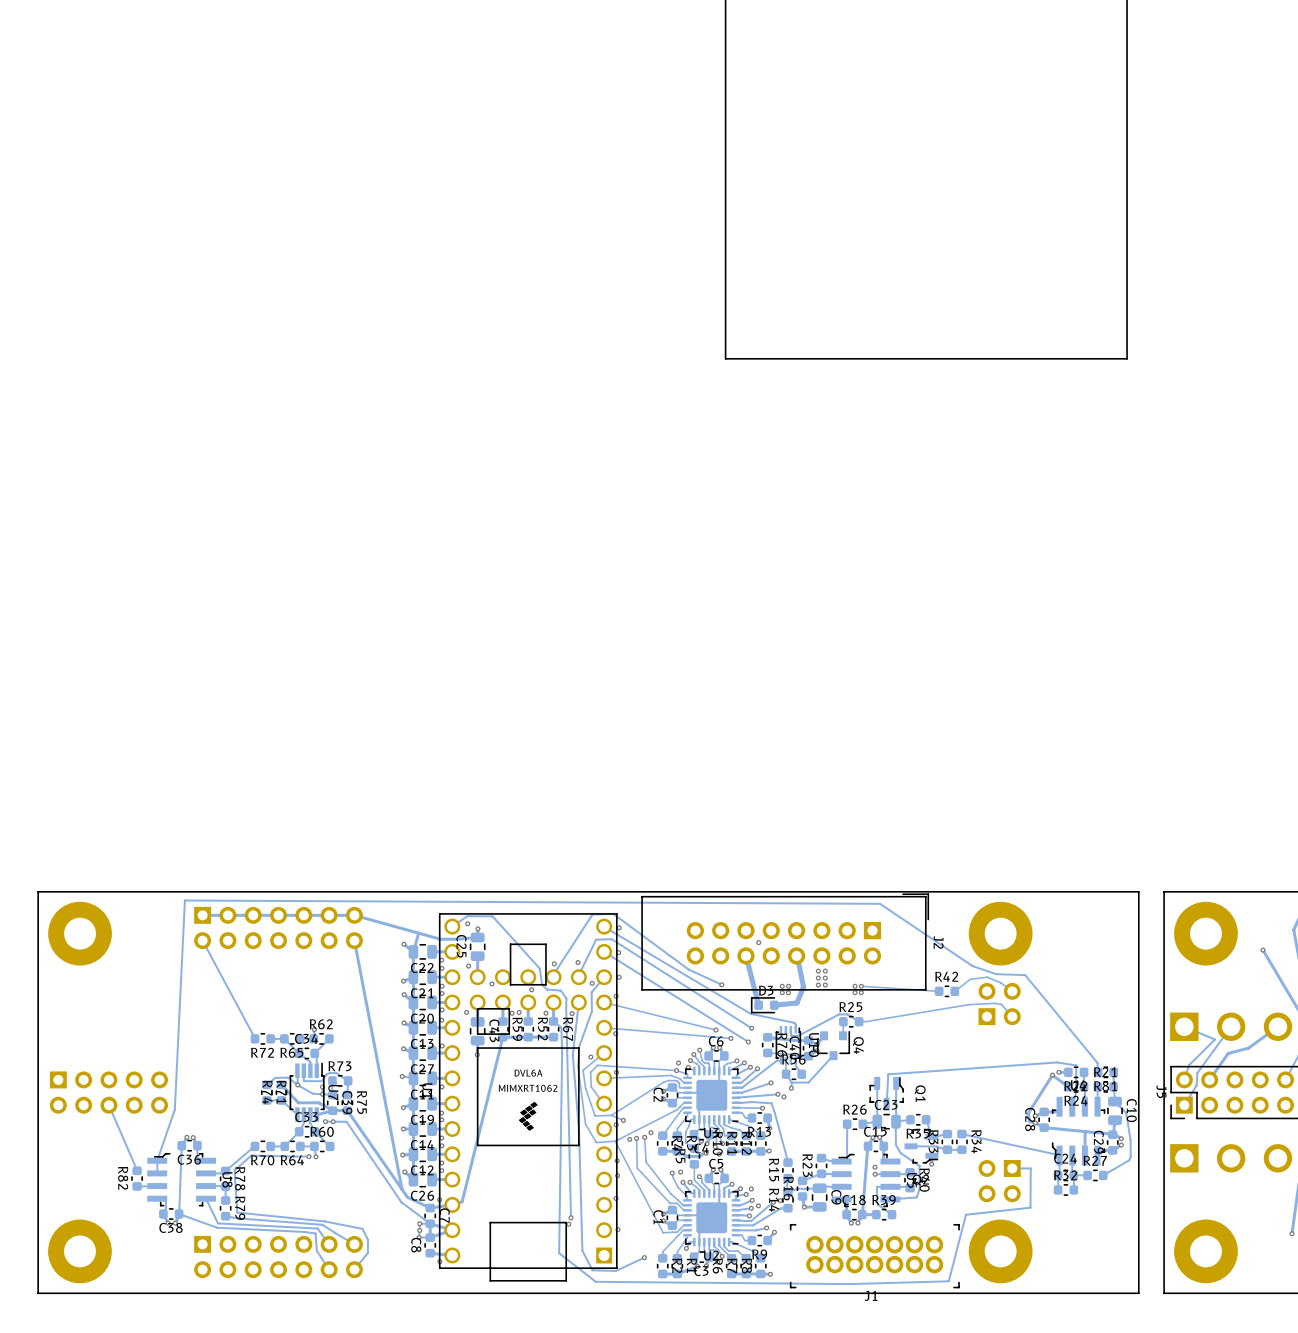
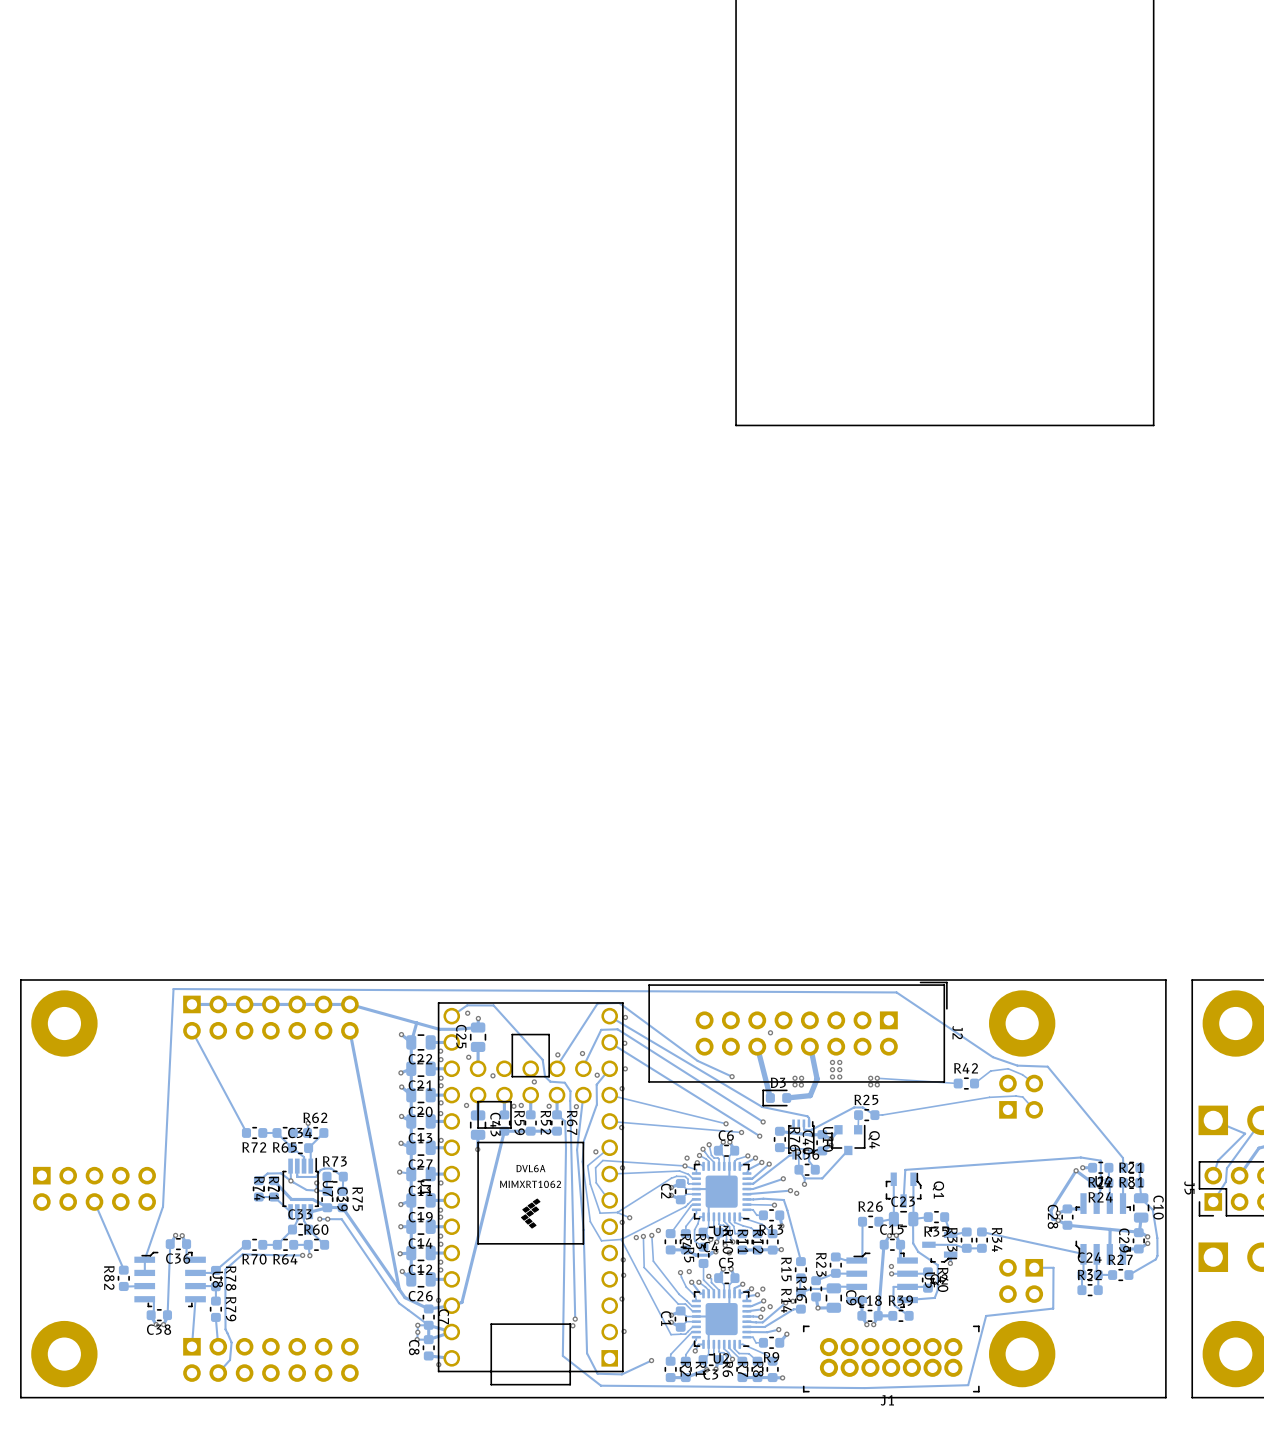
track: (234, 1173) (237, 1212) (324, 1221) (362, 1228) (367, 1239) (367, 1252) (354, 1269) -> (225, 1273) (225, 1329) (231, 1342) (229, 1360) (218, 1373)
track: (206, 1198) (218, 1223) (317, 1228) (329, 1244) -> (195, 1299) (191, 1346)
track: (179, 1214) (217, 1227) (315, 1233) (316, 1250) (329, 1269) -> none
track: (225, 1216) (322, 1224) (354, 1244) -> (215, 1317) (218, 1346)

